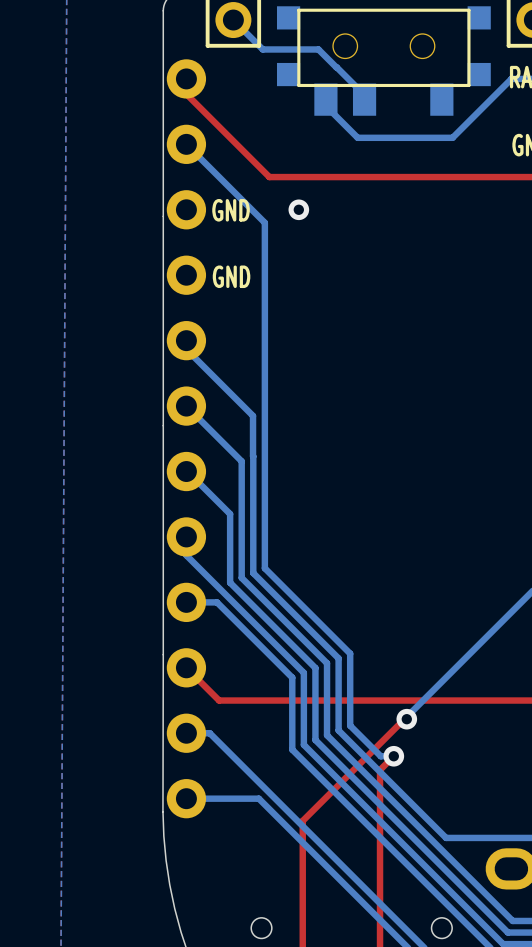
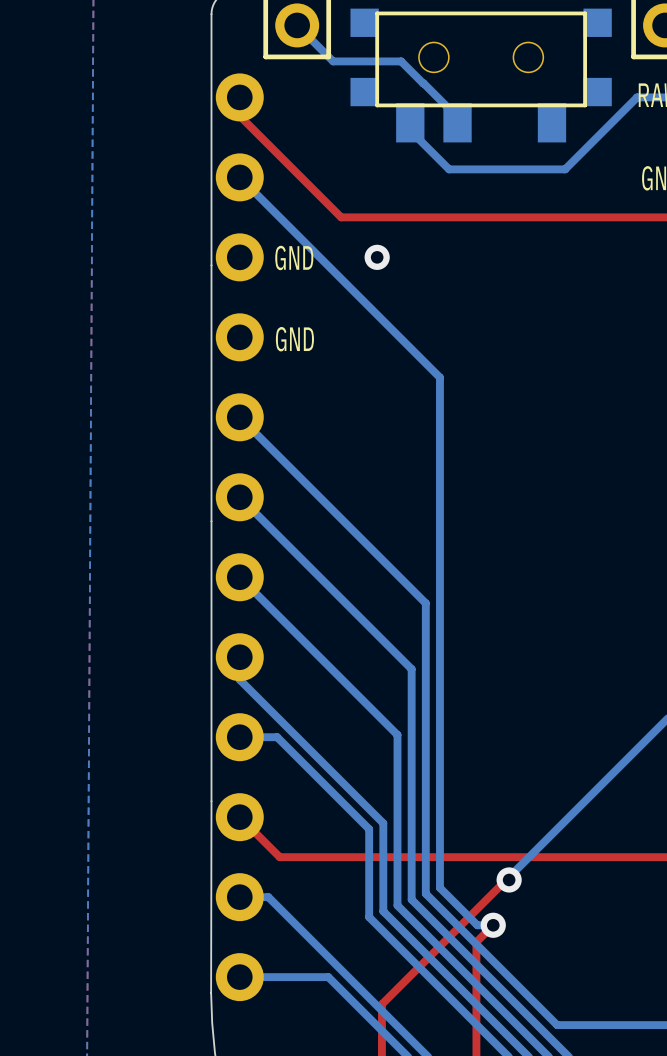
bottom track: (264, 222) (264, 568) (350, 653) -> (335, 273) (439, 377) (439, 799)
bottom track: (186, 340) (186, 349) (253, 415) (253, 456) -> none
bottom track: (253, 456) (253, 573) (338, 658) -> (239, 417) (425, 603) (425, 805)
bottom track: (241, 461) (241, 577) (327, 663) -> (307, 564) (411, 669) (411, 811)
bottom track: (186, 471) (230, 514) (230, 582) (315, 668) -> (239, 577) (397, 734) (397, 817)

